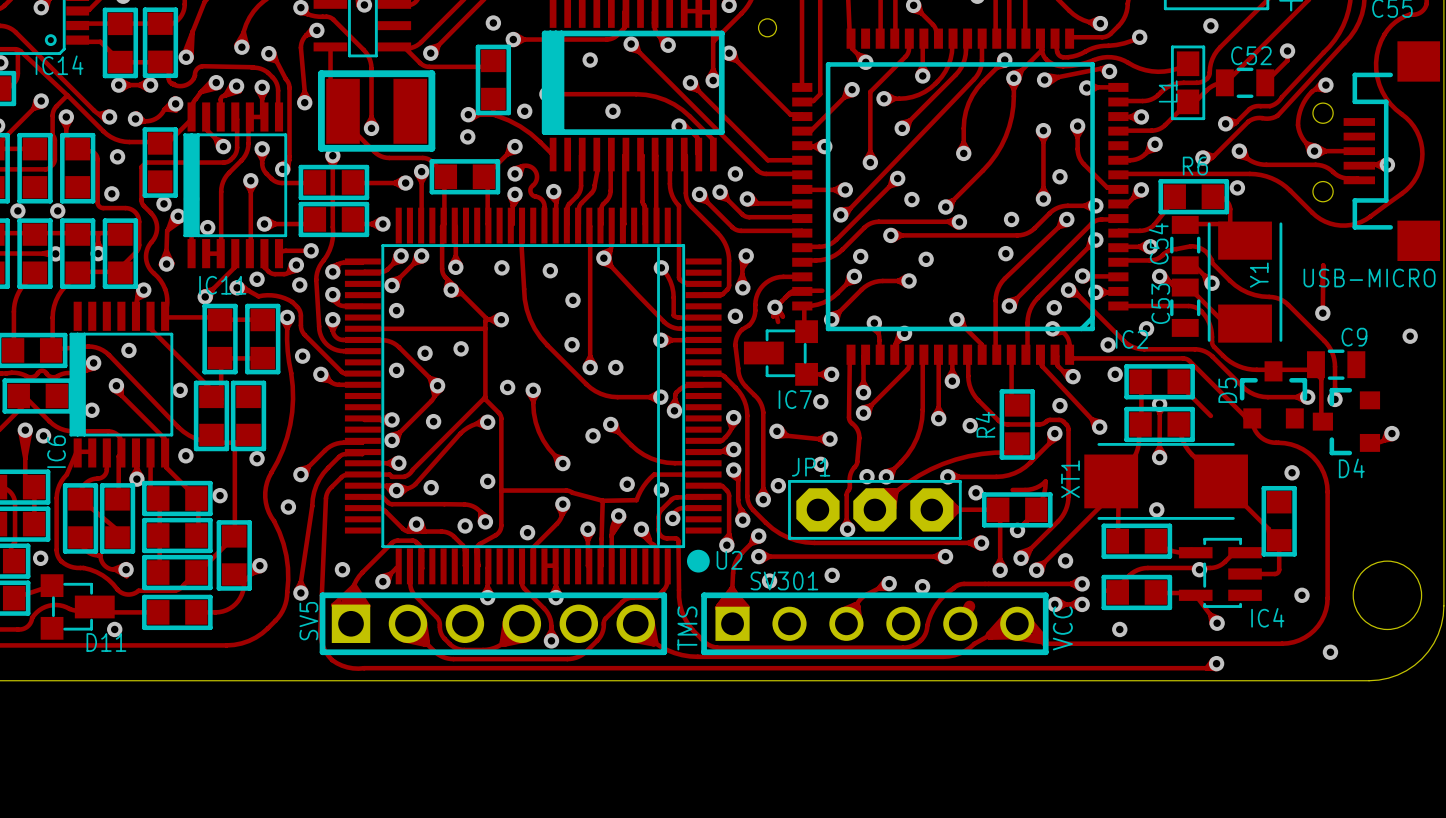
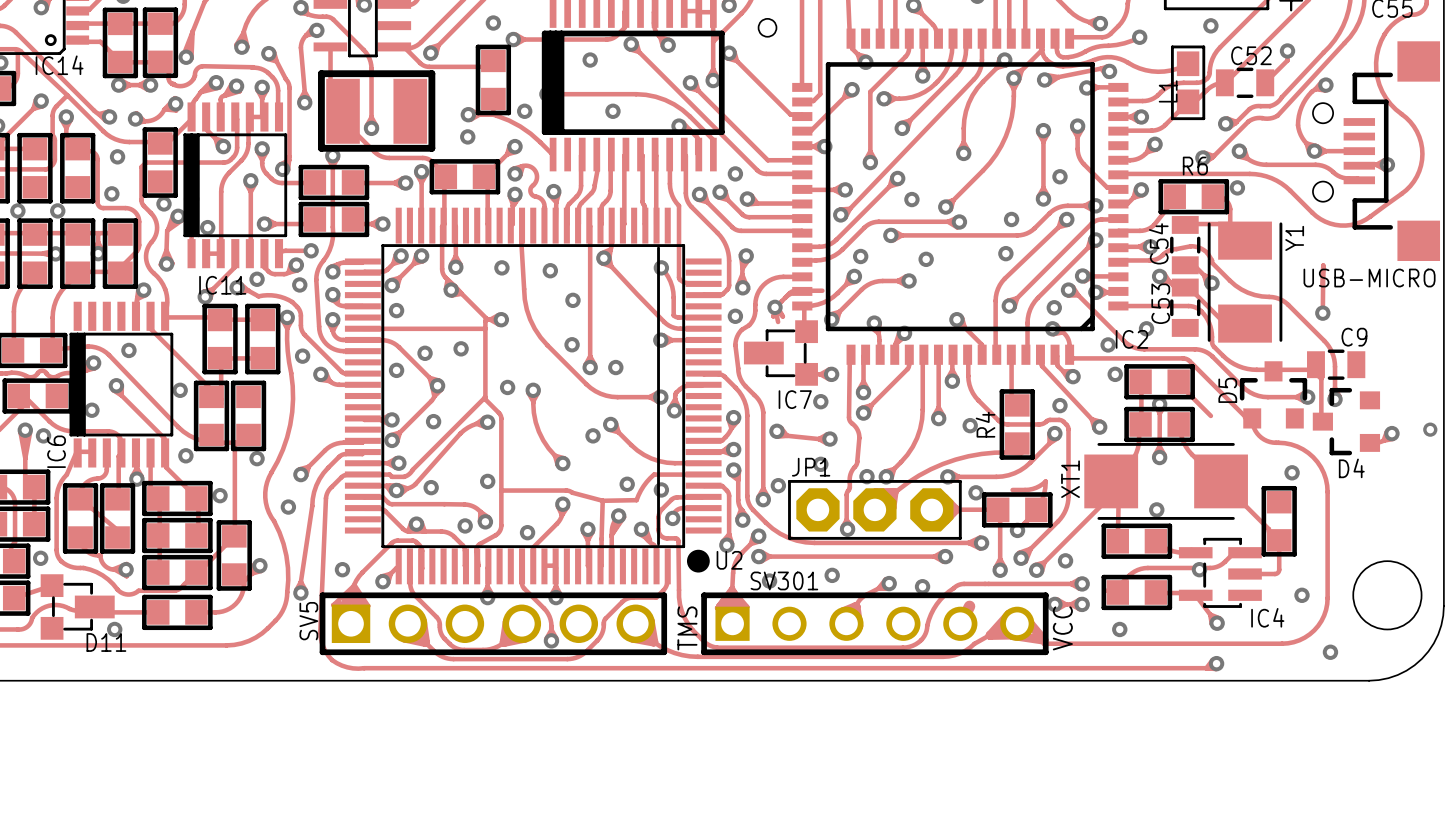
Y1 name position: Y1 (1259, 275) -> Y1 (1294, 238)
via: (1410, 336) -> none
via: none -> (1430, 429)

